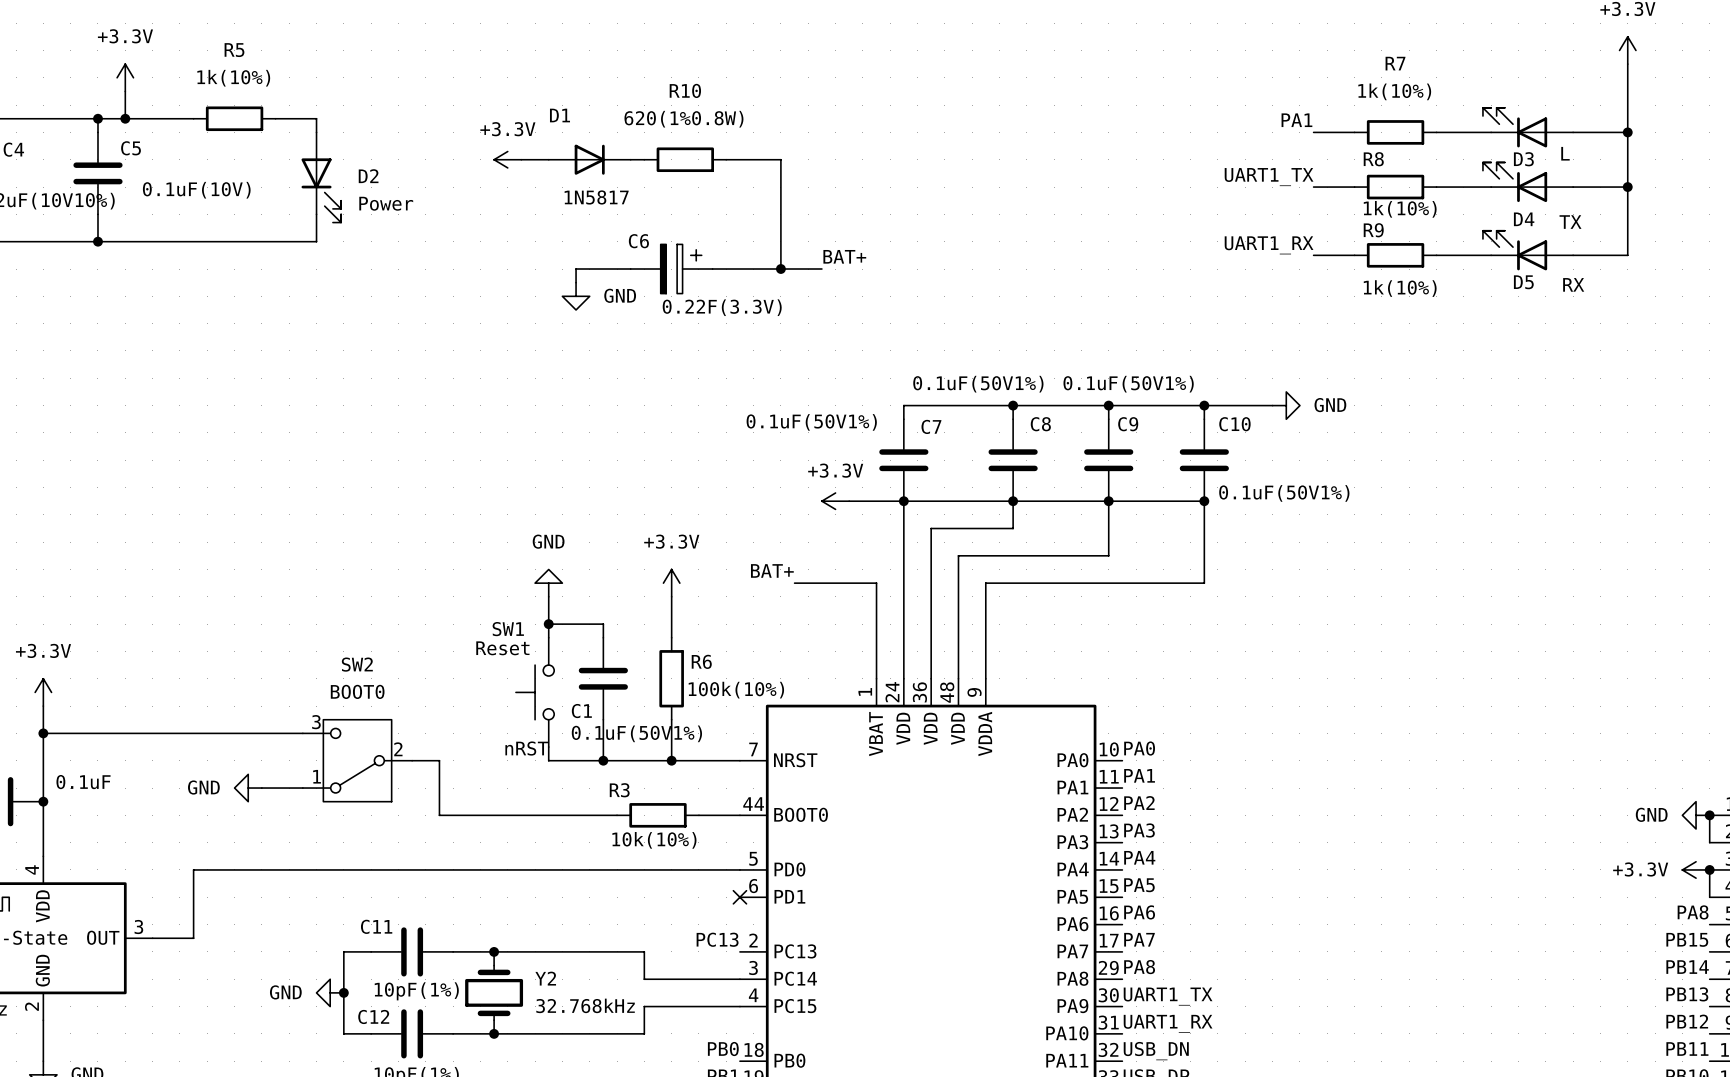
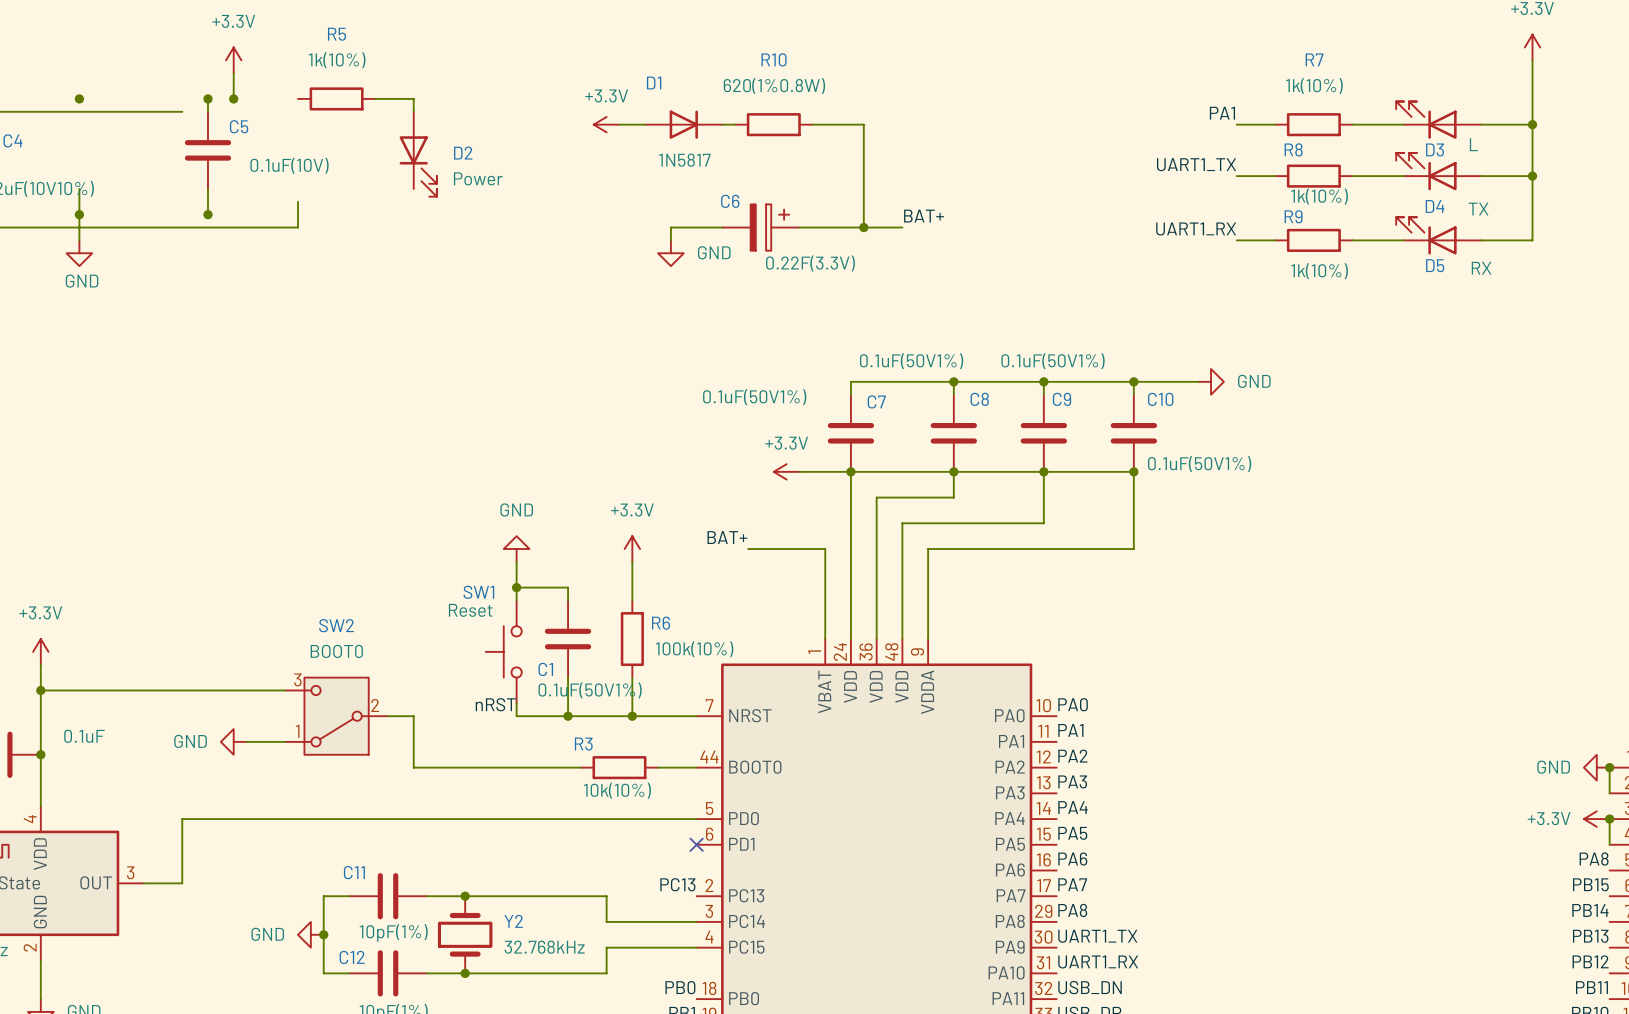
power symbol position: +3.3V (125, 77) -> +3.3V (233, 60)
wire: (125, 91) (125, 118) -> (233, 73) (233, 98)
junction: none -> (207, 98)
junction: none -> (233, 98)
wire: (97, 118) (97, 132) -> (207, 98) (207, 111)
junction position: (97, 118) -> (79, 98)
junction: (125, 118) -> none
R5 position: (234, 118) -> (336, 98)
wire: (275, 118) (316, 118) (316, 132) -> (375, 98) (413, 98) (413, 111)
power symbol: none -> +3.3V (606, 124)
power symbol: +3.3V (507, 159) -> none
wire: (521, 159) (548, 159) -> (619, 124) (645, 124)
D1 position: (589, 159) -> (683, 124)
wire: (630, 159) (644, 159) -> (722, 124) (735, 124)
R10 position: (685, 159) -> (773, 124)
wire: (726, 159) (780, 159) (780, 269) -> (812, 124) (863, 124) (863, 227)
C5 position: (97, 173) -> (207, 150)
D2 position: (321, 177) -> (418, 154)
wire: none -> (79, 188) (79, 240)
wire: (97, 214) (97, 241) -> (207, 188) (207, 214)
junction: none -> (207, 214)
junction position: (97, 241) -> (79, 214)
junction: none -> (863, 227)
label position: BAT+ (844, 256) -> BAT+ (924, 216)
power symbol: none -> GND (79, 253)
wire: (630, 269) (576, 269) (576, 282) -> (722, 227) (670, 227) (670, 240)
C6 position: (671, 269) -> (760, 227)
wire: (712, 269) (821, 269) -> (799, 227) (902, 227)
junction: (780, 269) -> none
power symbol position: GND (576, 296) -> GND (670, 253)

